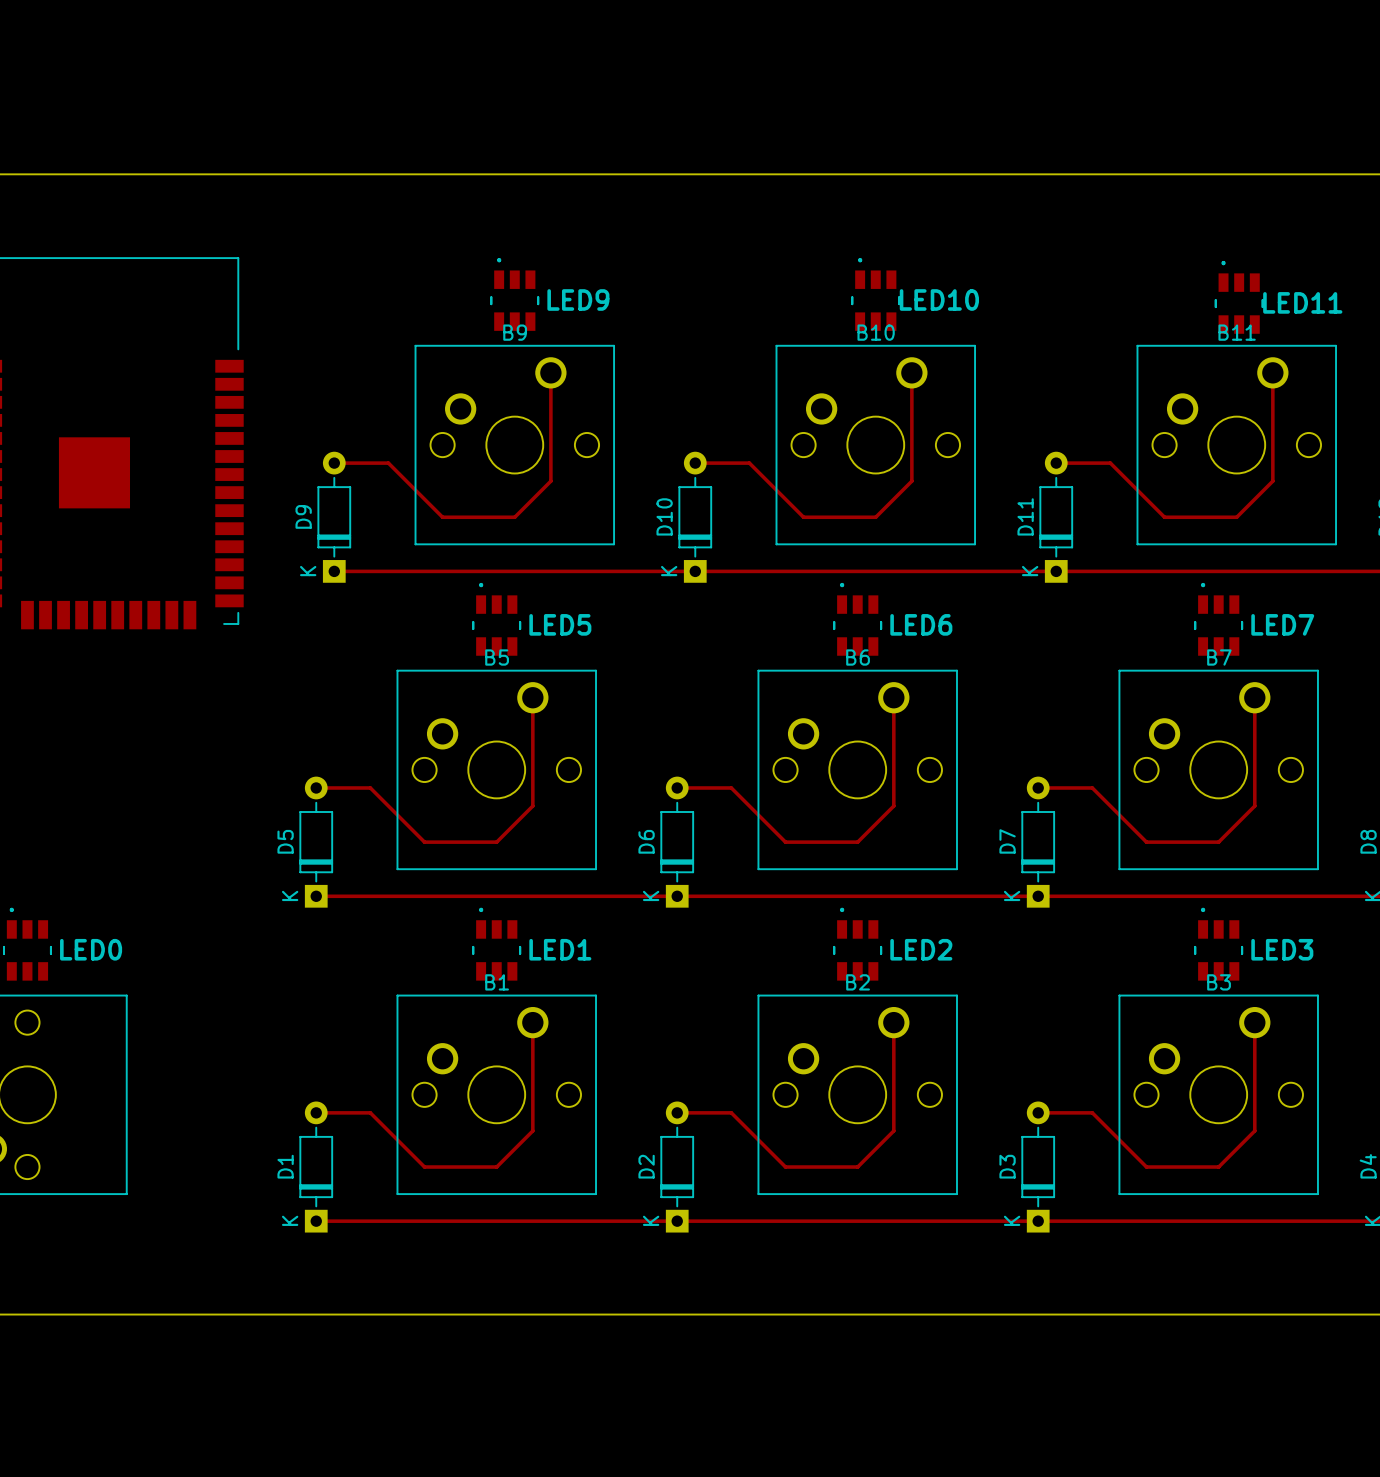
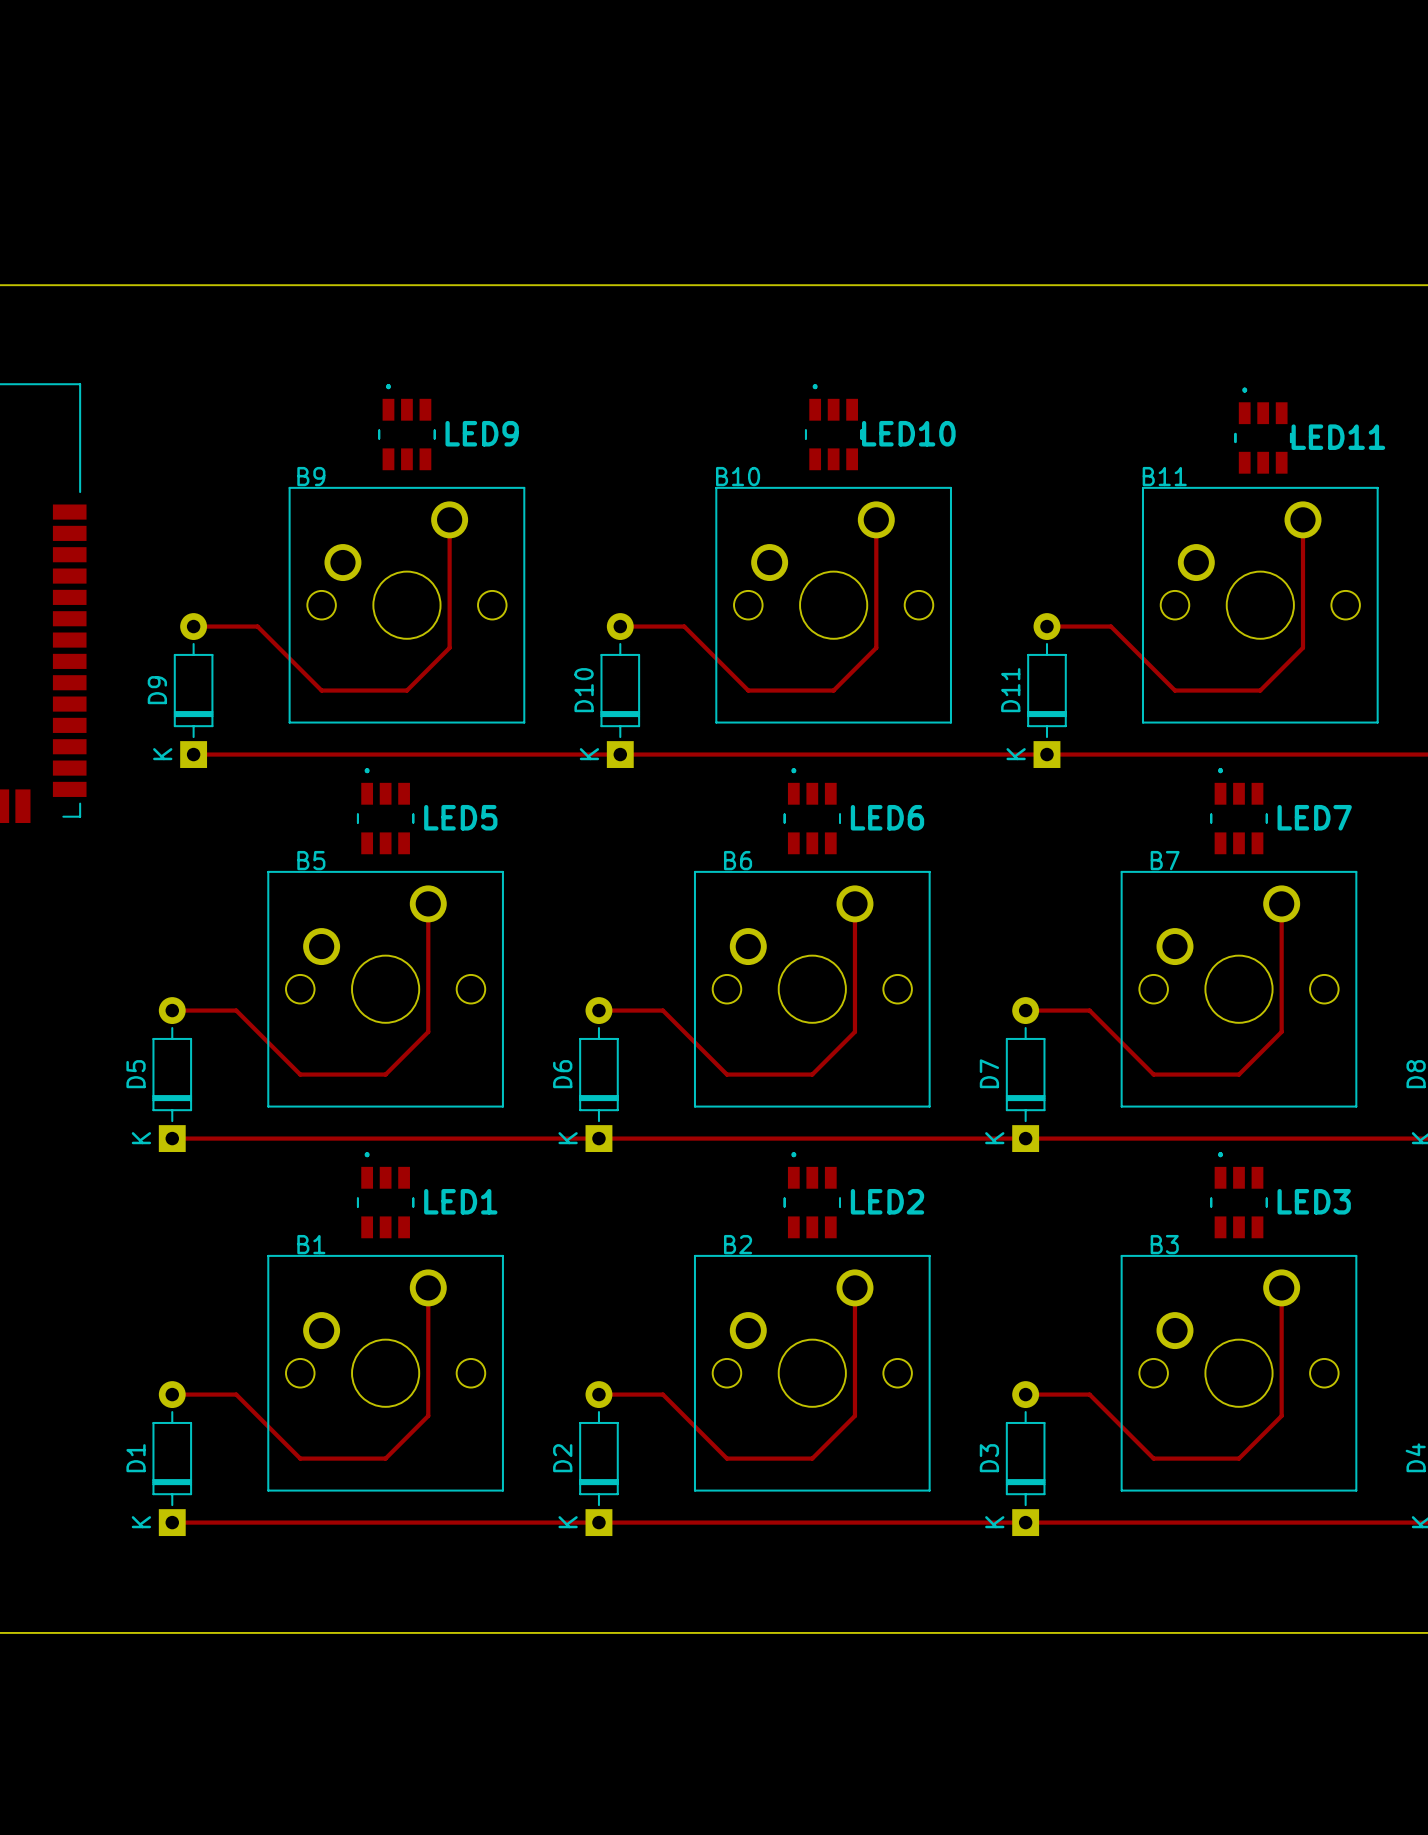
B9 name position: B9 (515, 332) -> B9 (311, 476)
B10 name position: B10 (876, 332) -> B10 (738, 476)
B11 name position: B11 (1237, 332) -> B11 (1164, 476)
B5 name position: B5 (497, 657) -> B5 (311, 860)
B6 name position: B6 (858, 657) -> B6 (738, 860)
B7 name position: B7 (1219, 657) -> B7 (1165, 860)
B1 name position: B1 (497, 982) -> B1 (311, 1244)
B2 name position: B2 (858, 982) -> B2 (738, 1244)
B3 name position: B3 (1219, 982) -> B3 (1164, 1244)

